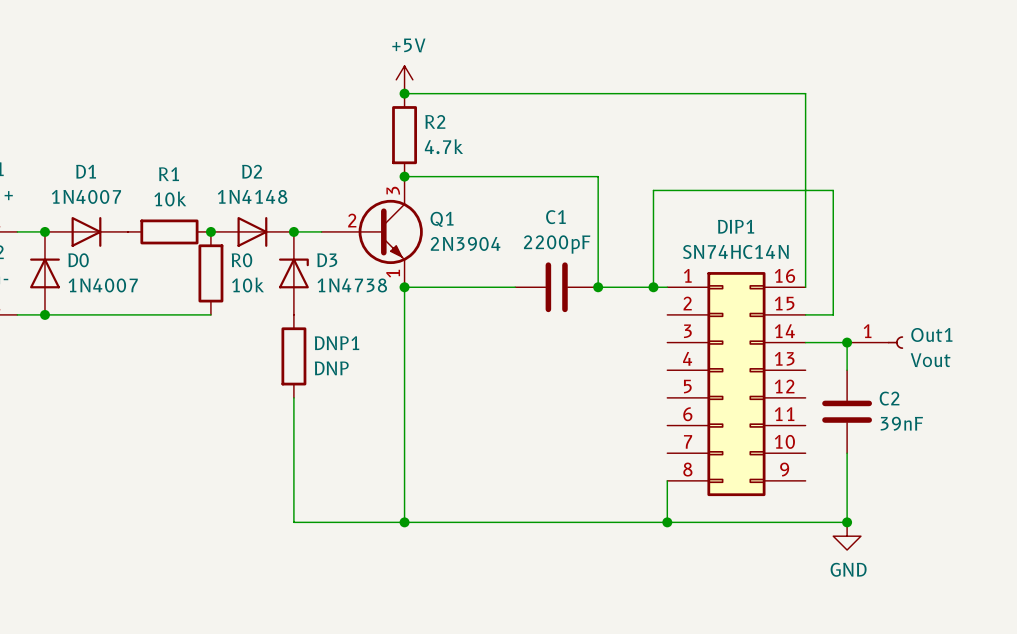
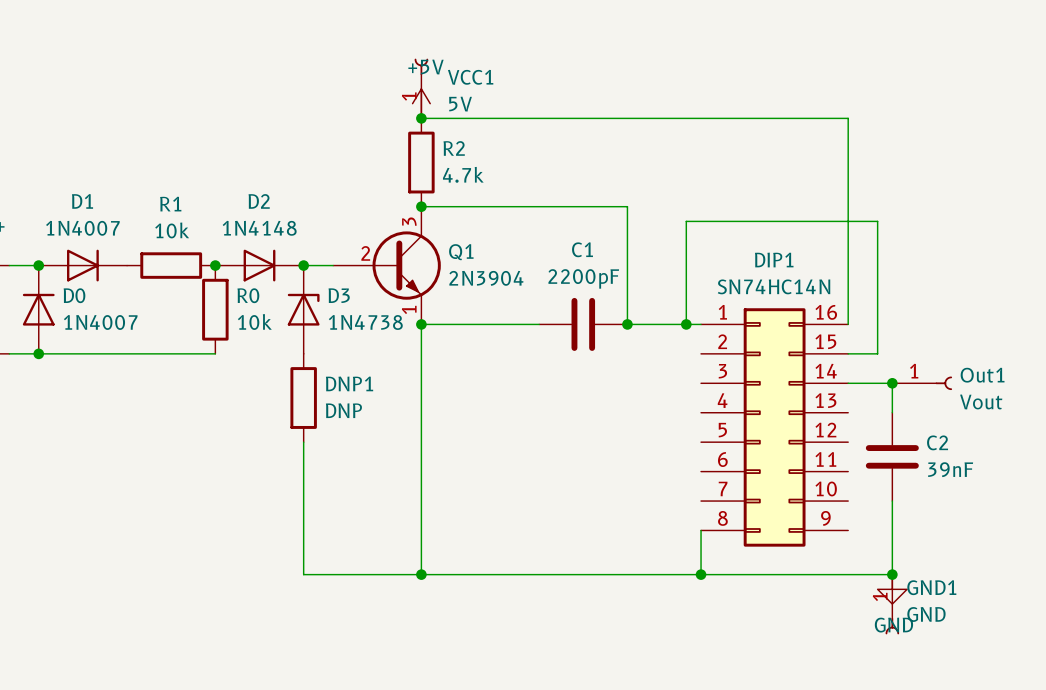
VCC1: none -> 5V (421, 88)
GND1: none -> GND (892, 604)

